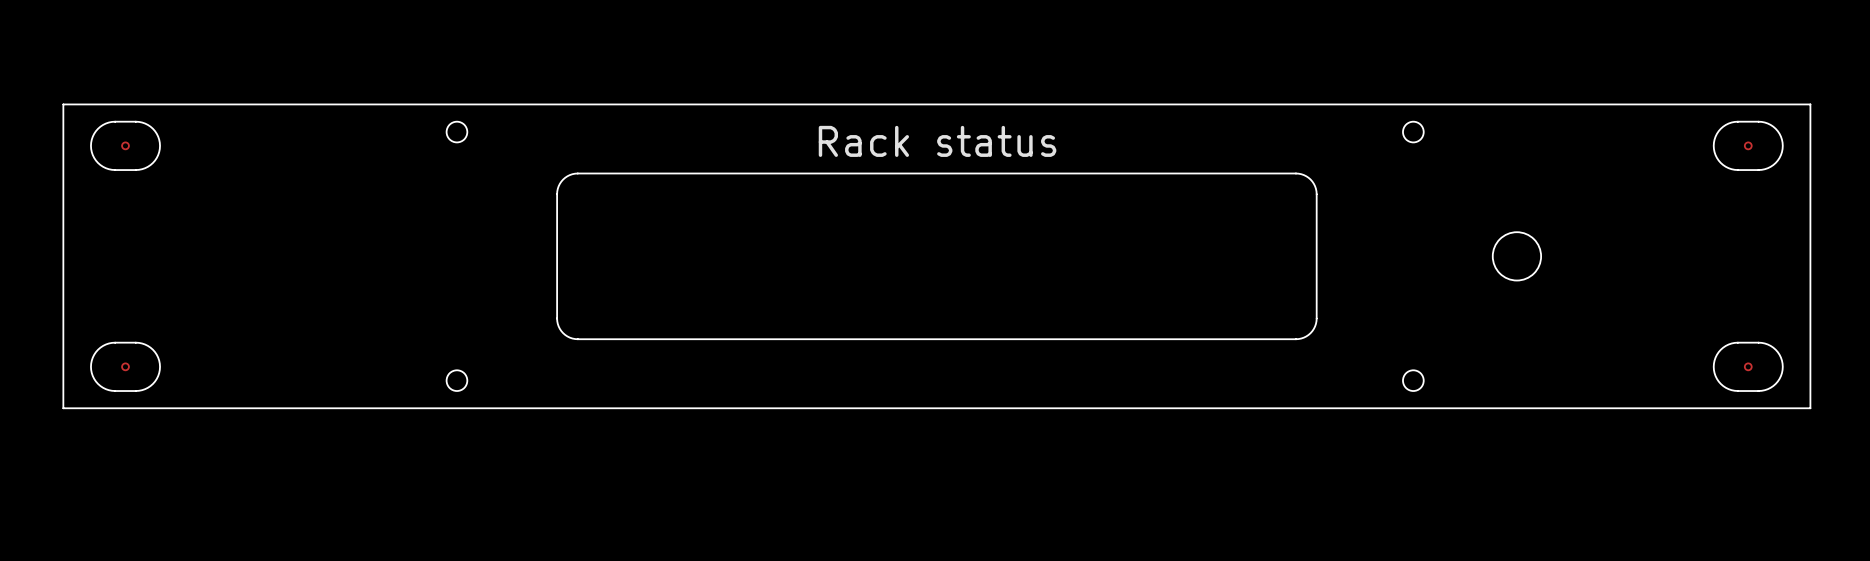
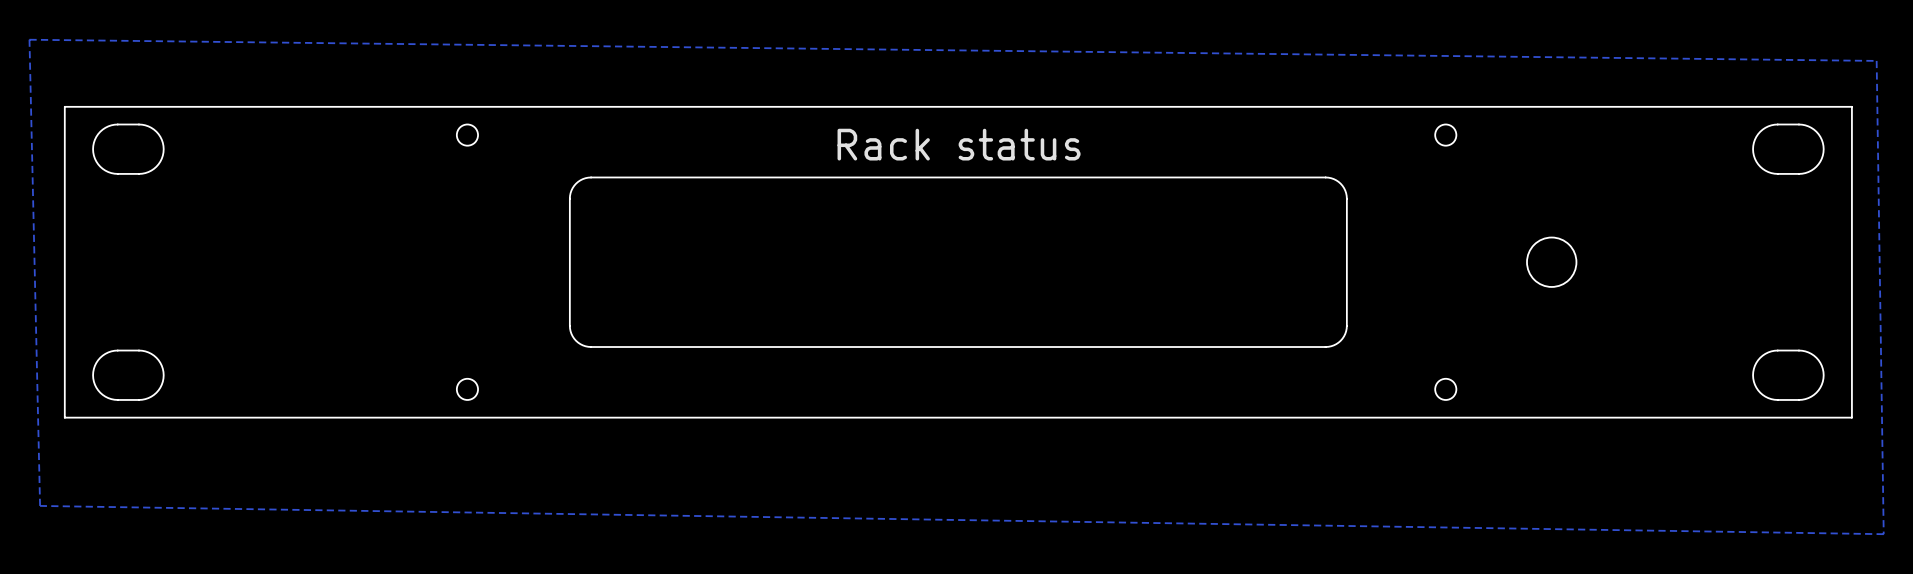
bottom zone outline: none -> (29, 39) (1876, 60) (1883, 534) (40, 505) (29, 39)
drawing: [121, 141, 130, 151] -> none
drawing: [1744, 141, 1753, 151] -> none
drawing: [121, 362, 130, 371] -> none
drawing: [1744, 362, 1753, 371] -> none

